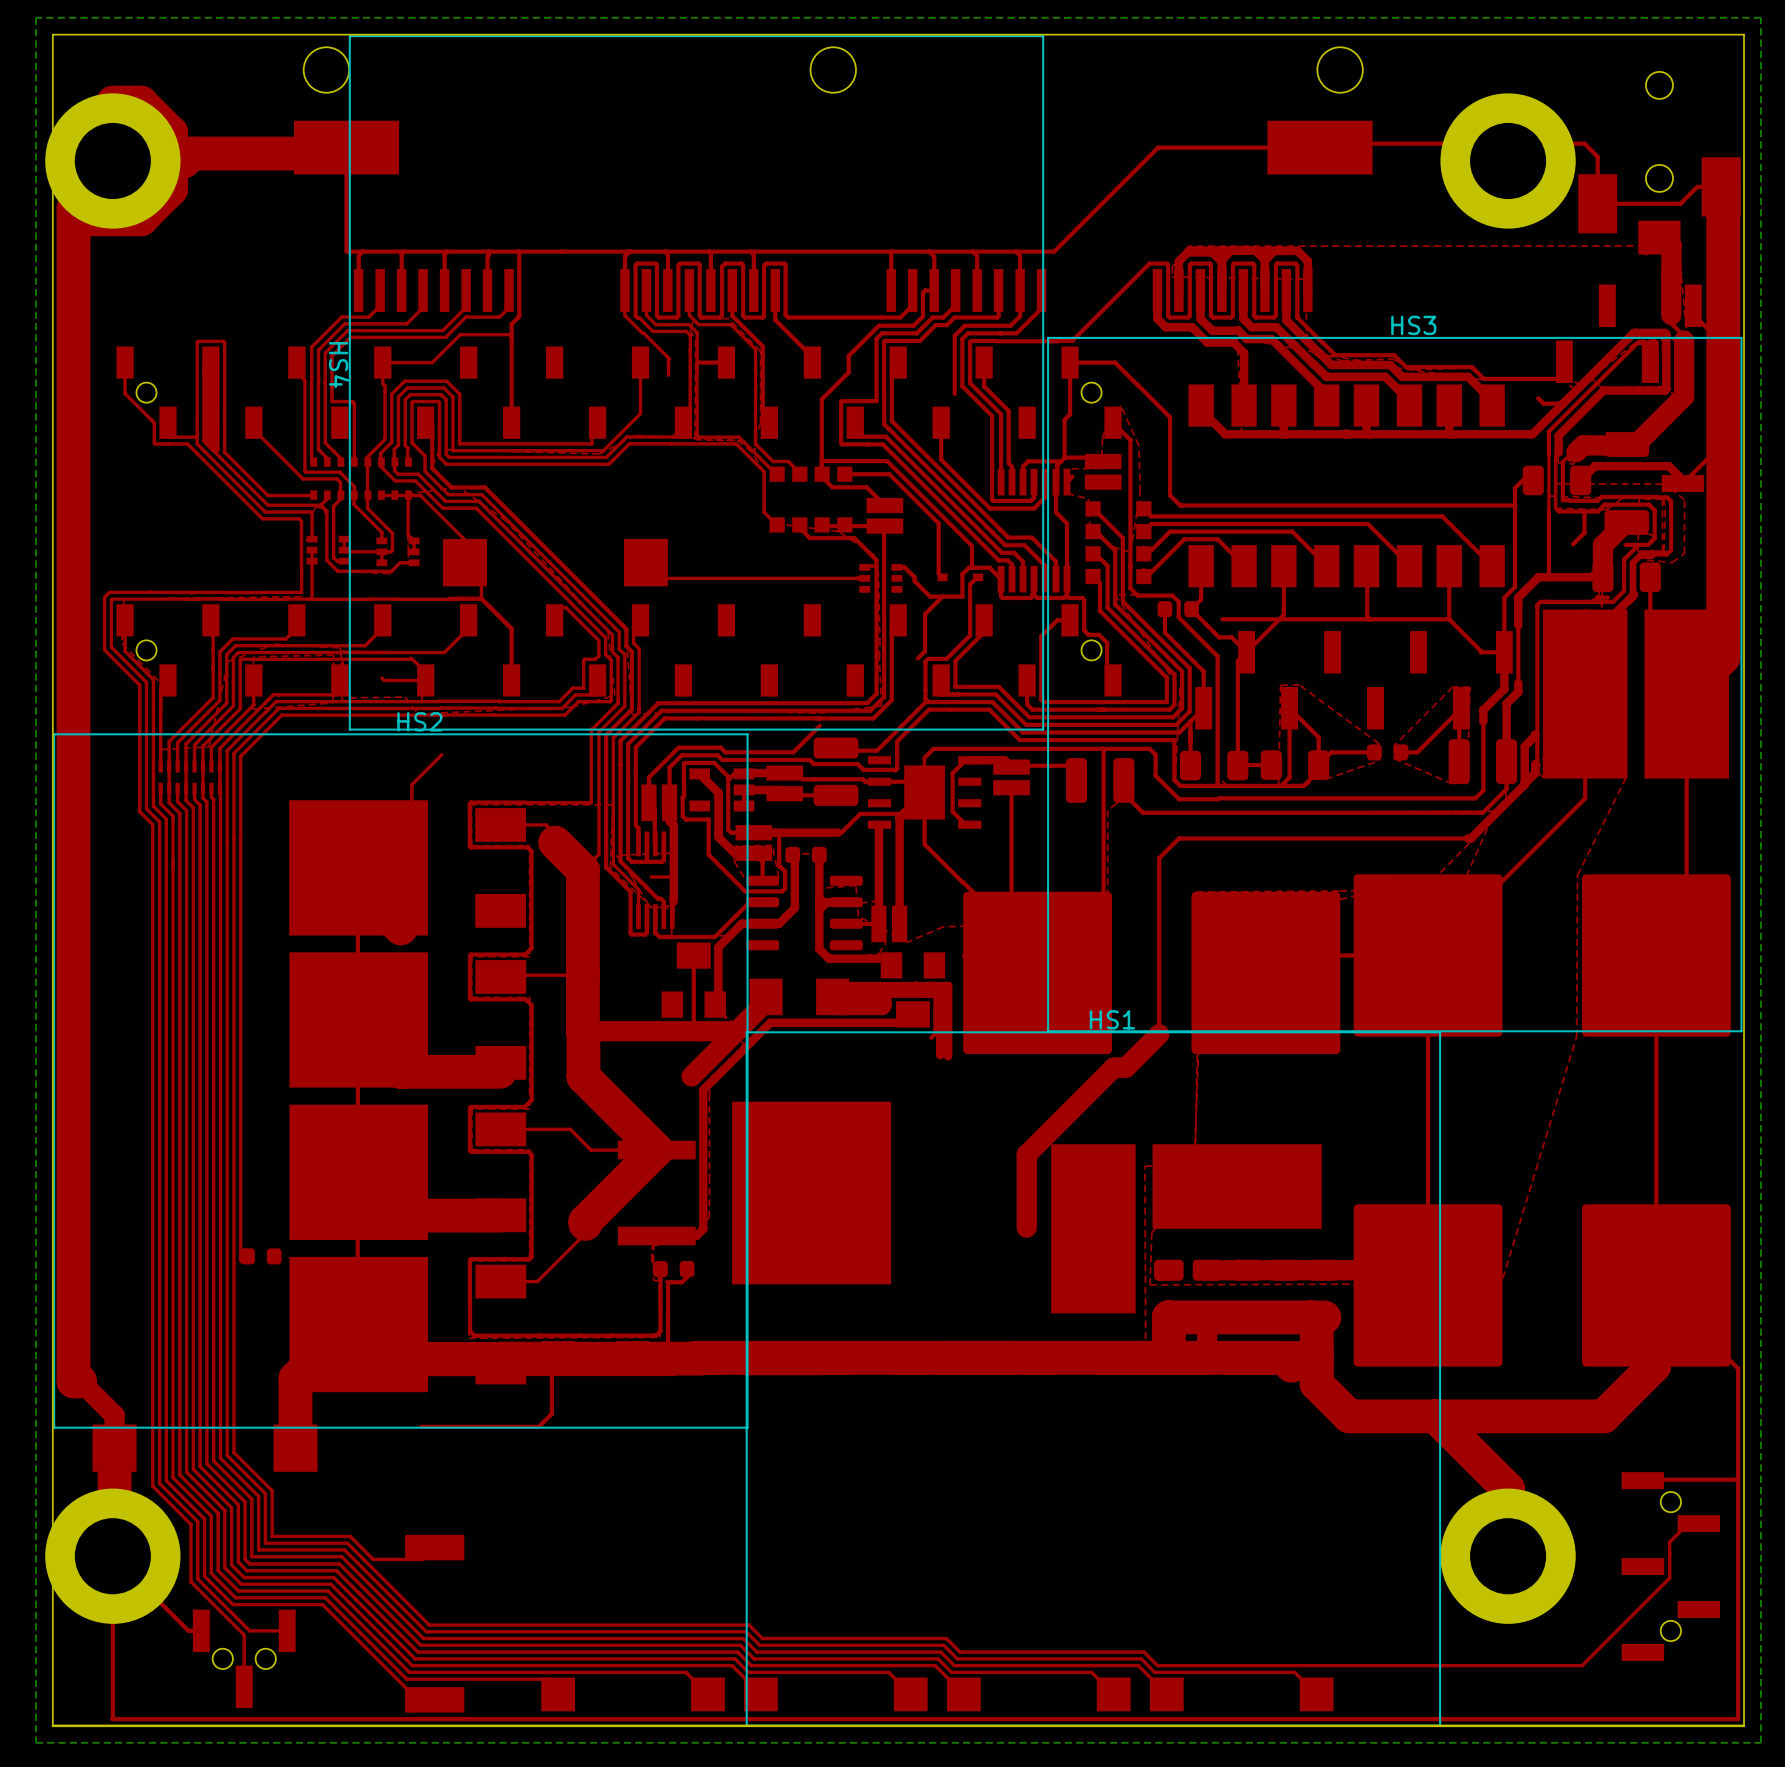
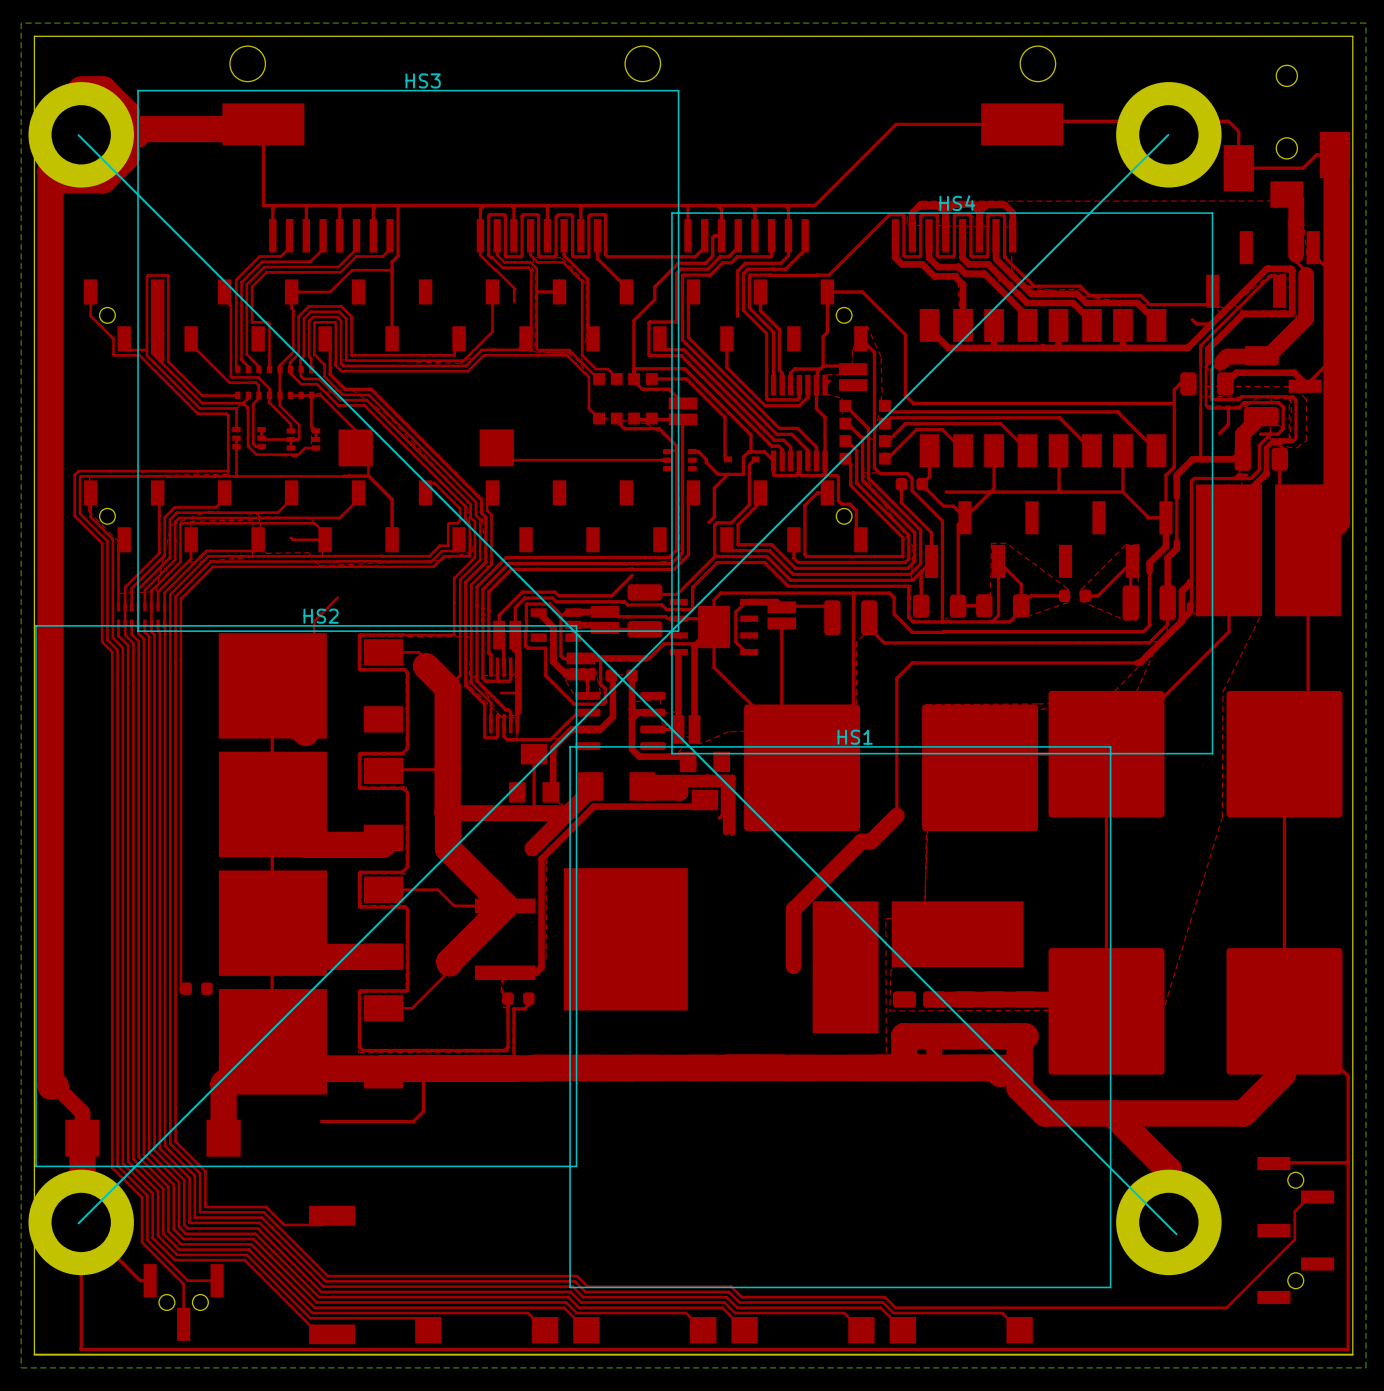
line: none -> (78, 135) (1176, 1234)
line: none -> (1168, 134) (78, 1223)
HS4 name rotation: 0° (338, 365) -> 90° counterclockwise (957, 203)
HS4 name position: HS4 (338, 365) -> HS4 (957, 203)
HS4 position: (696, 382) -> (942, 483)
HS3 position: (1394, 684) -> (408, 360)
HS2 position: (400, 1081) -> (306, 896)
HS1 position: (1093, 1378) -> (840, 1017)

